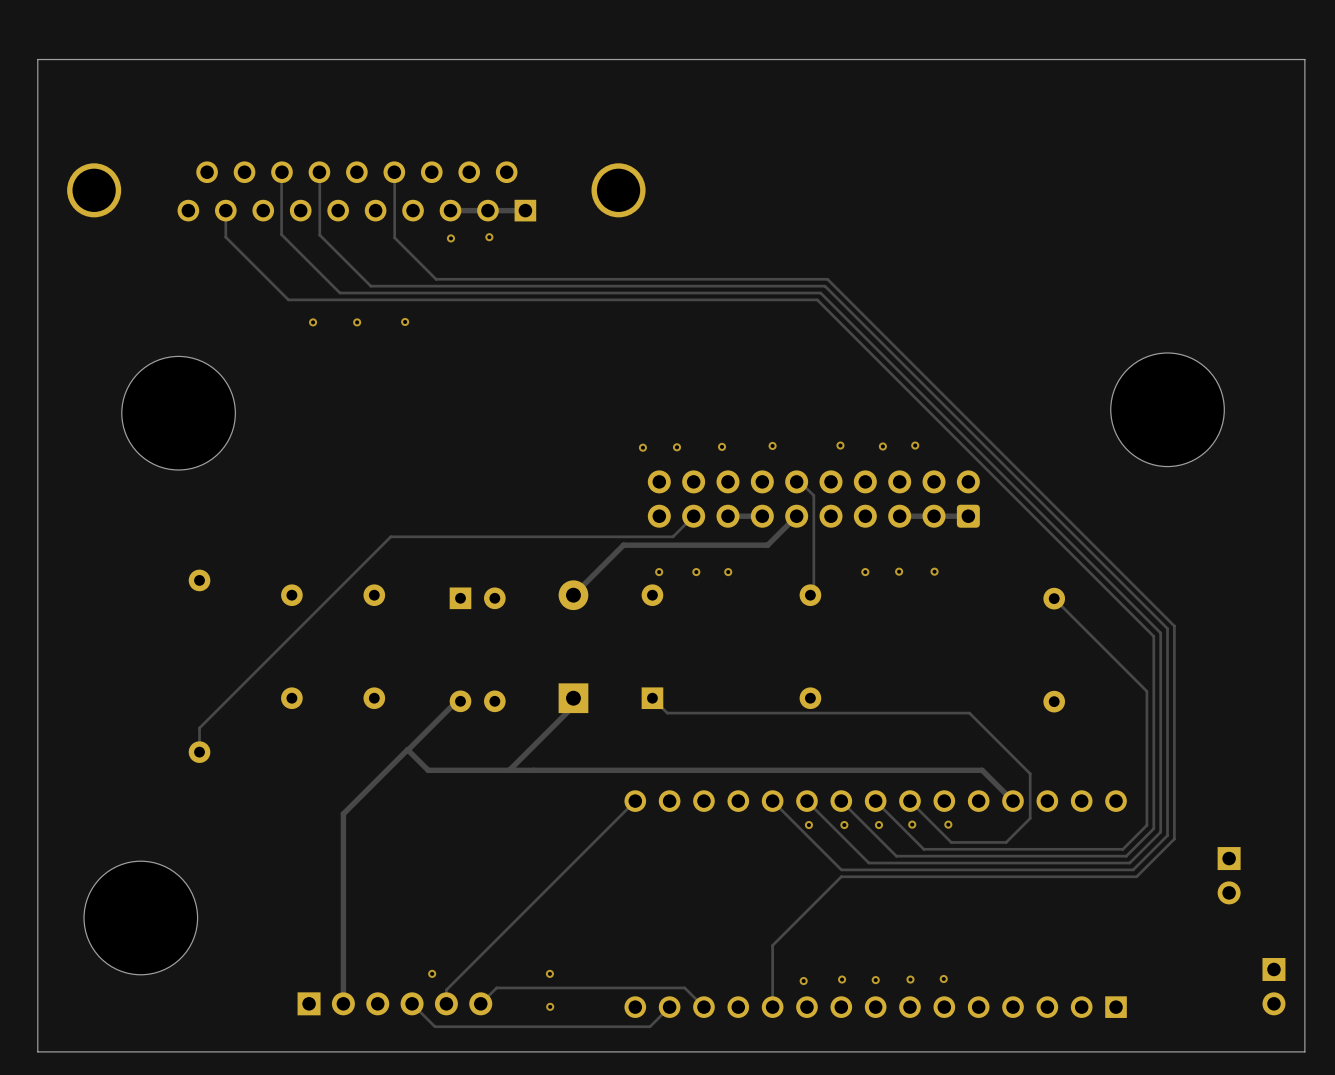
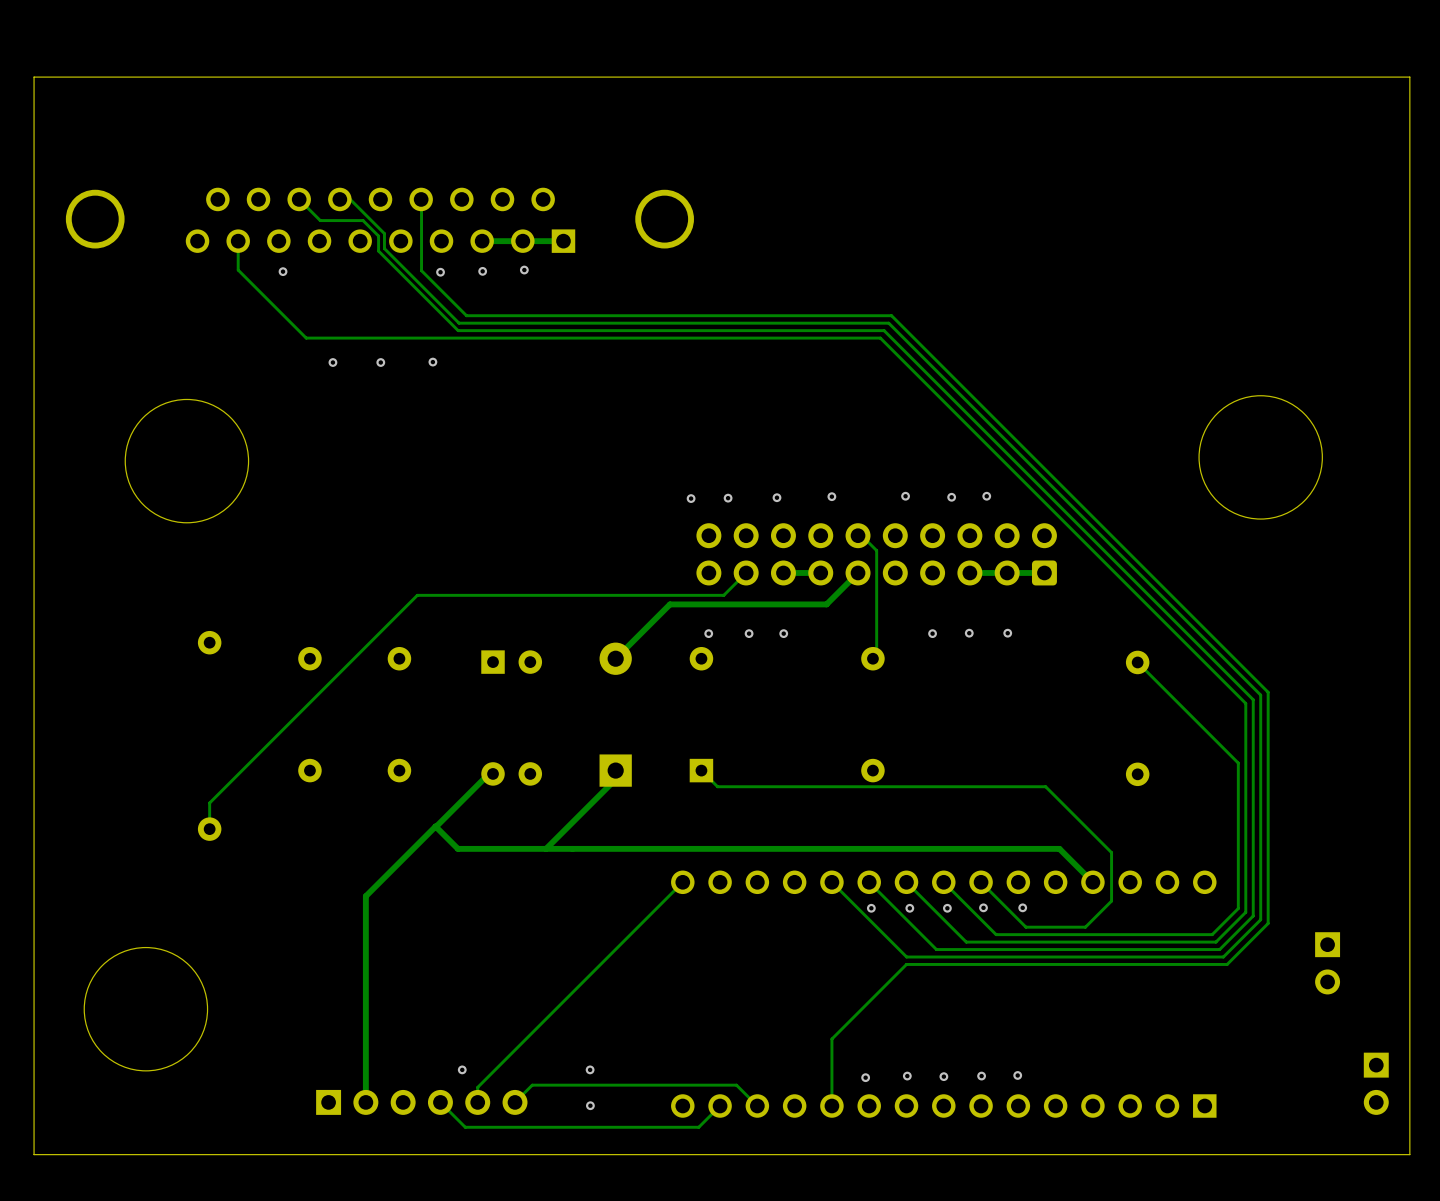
track: (281, 172) (281, 234) (339, 293) (428, 293) -> (299, 199) (320, 220) (363, 220) (378, 236) (378, 251) (458, 330)
track: (319, 172) (319, 235) (370, 286) (429, 286) -> (340, 199) (350, 199) (384, 233) (384, 248) (459, 323)
via: none -> (283, 271)
via: none -> (440, 272)

